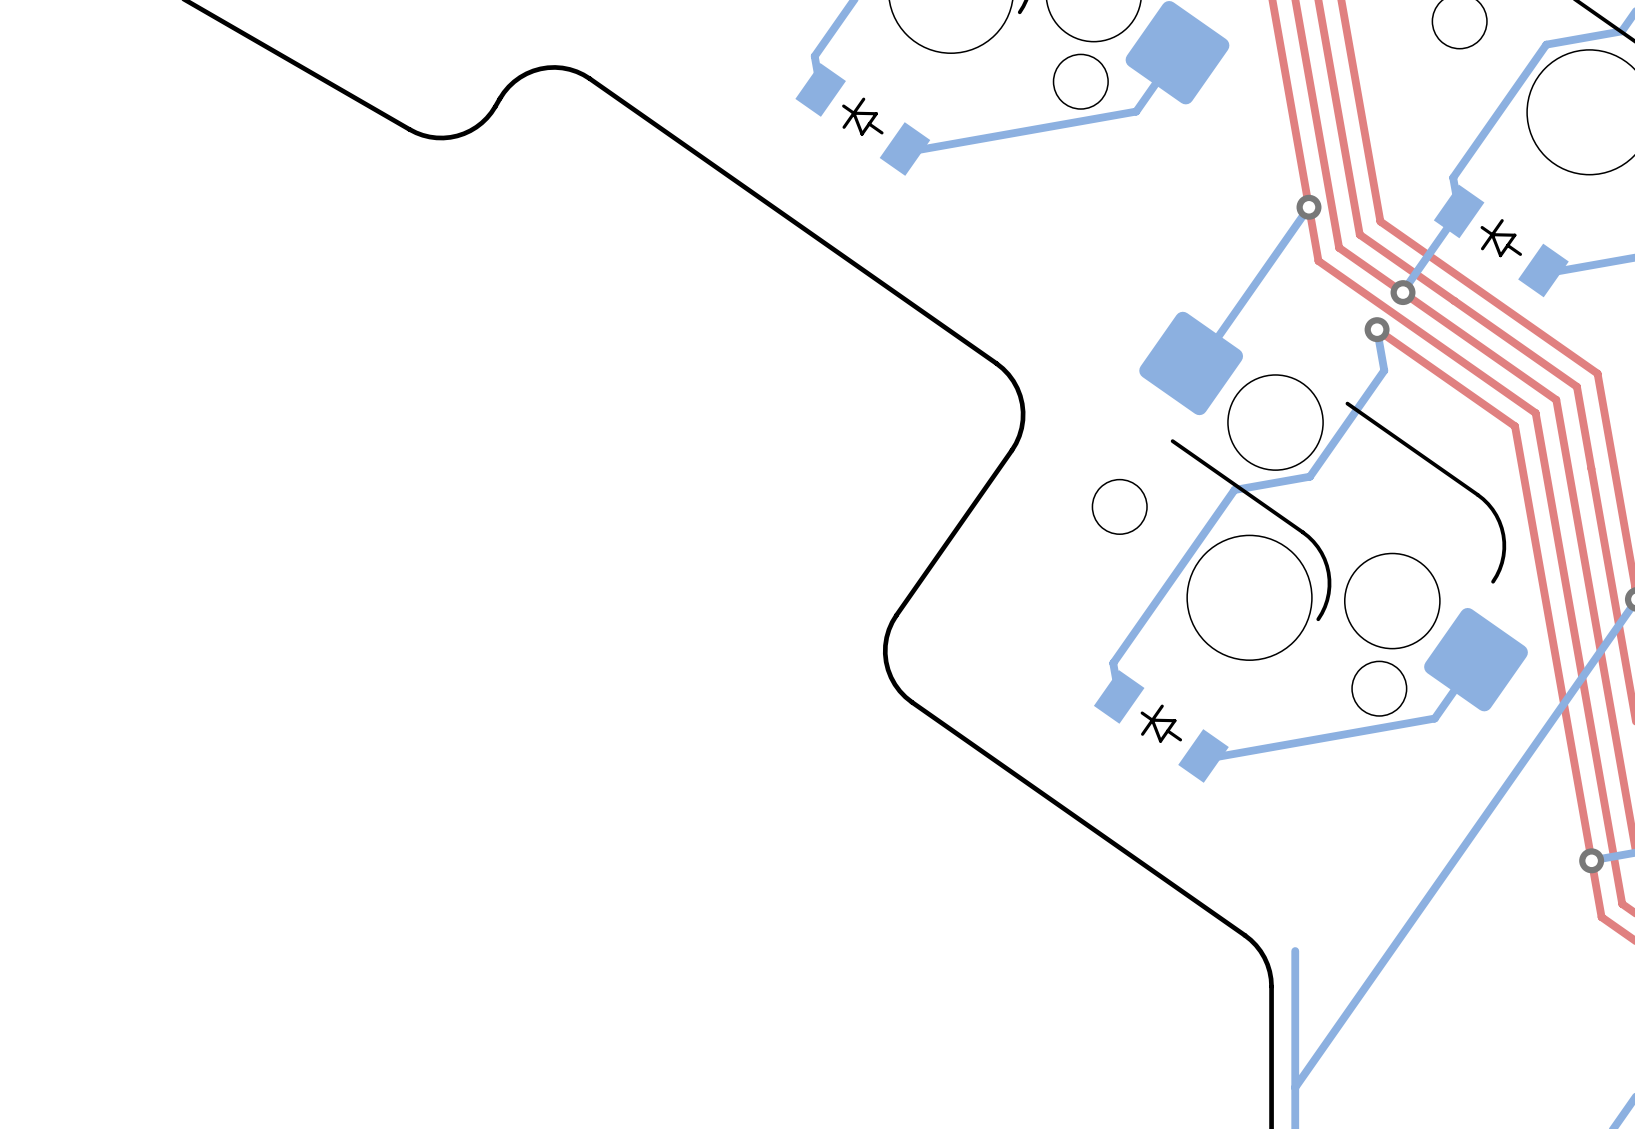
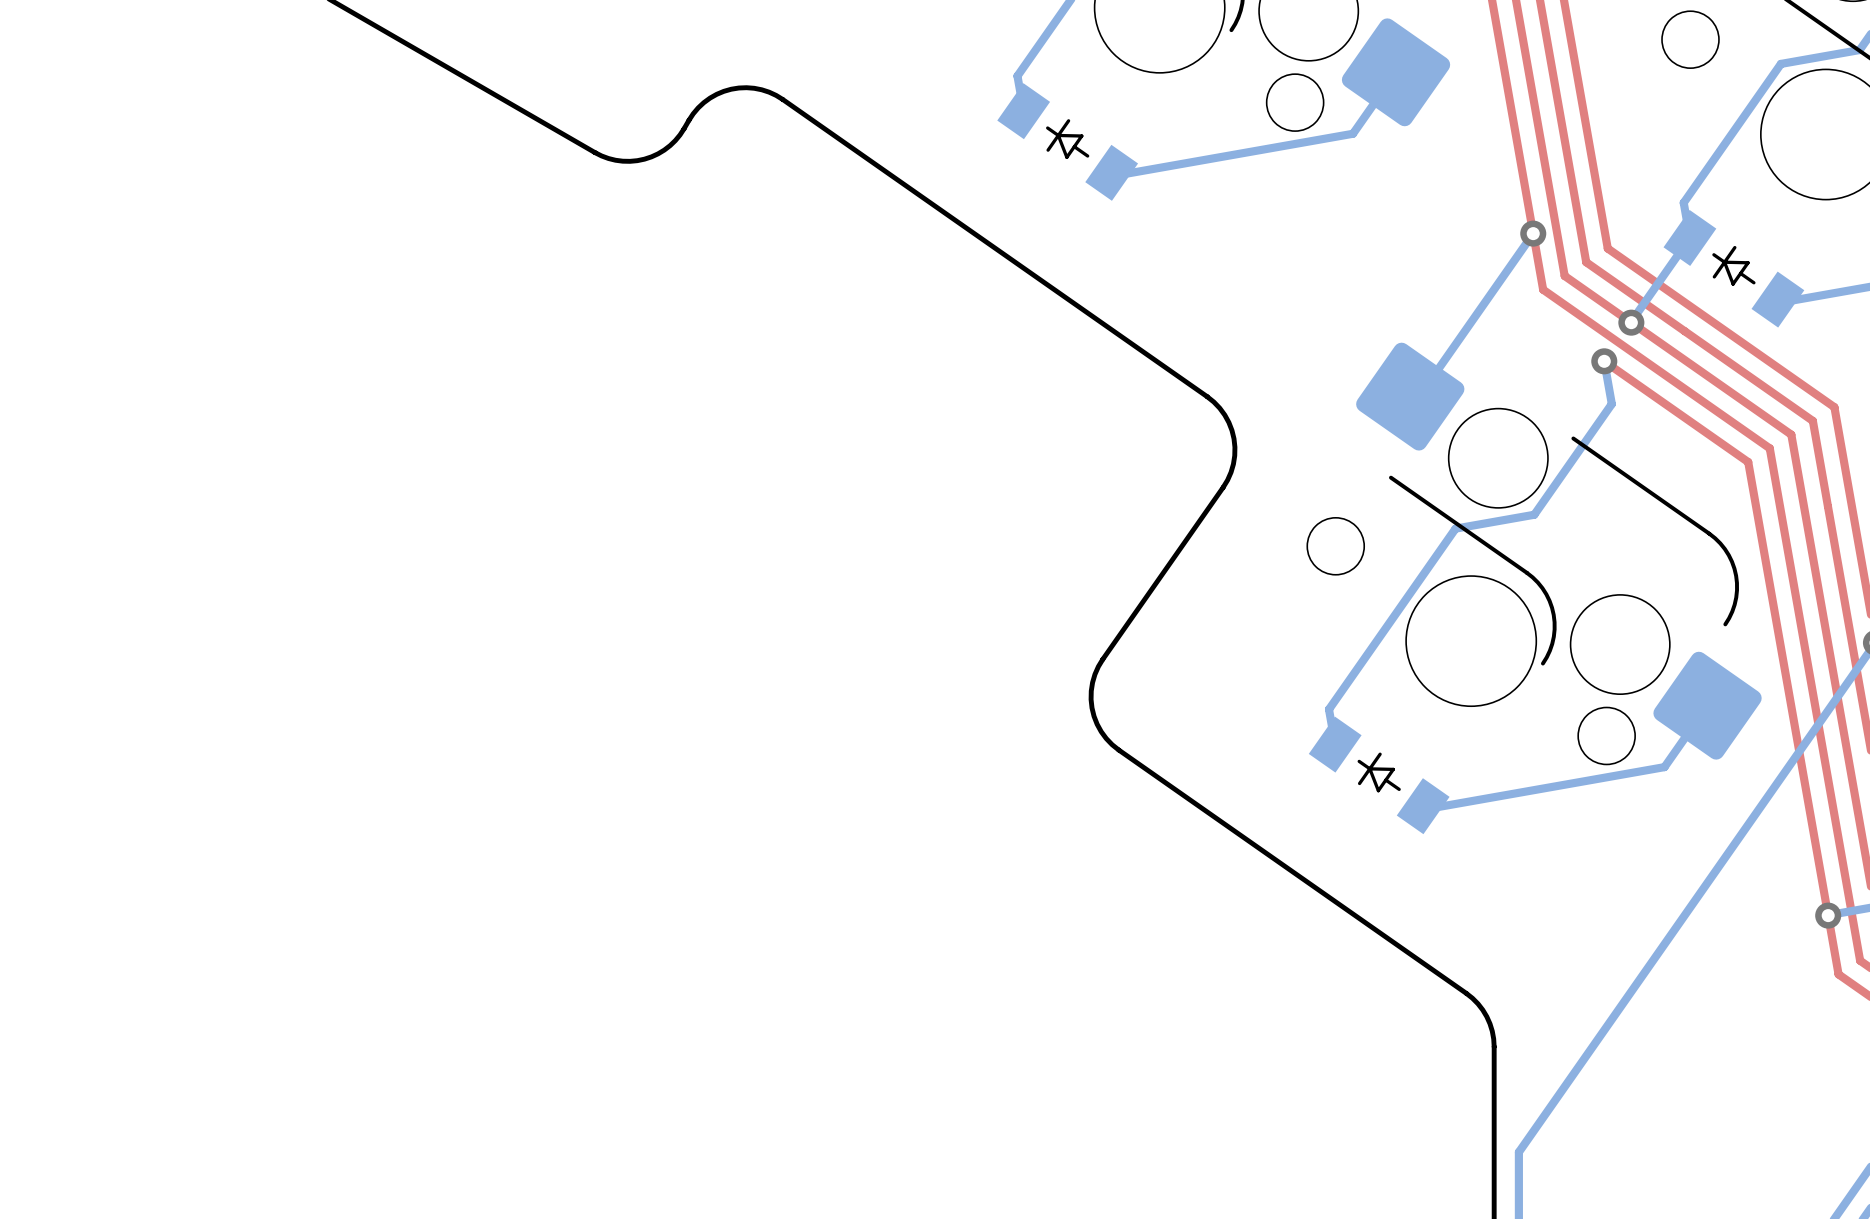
bottom track: (1295, 951) (1295, 1087) -> none

